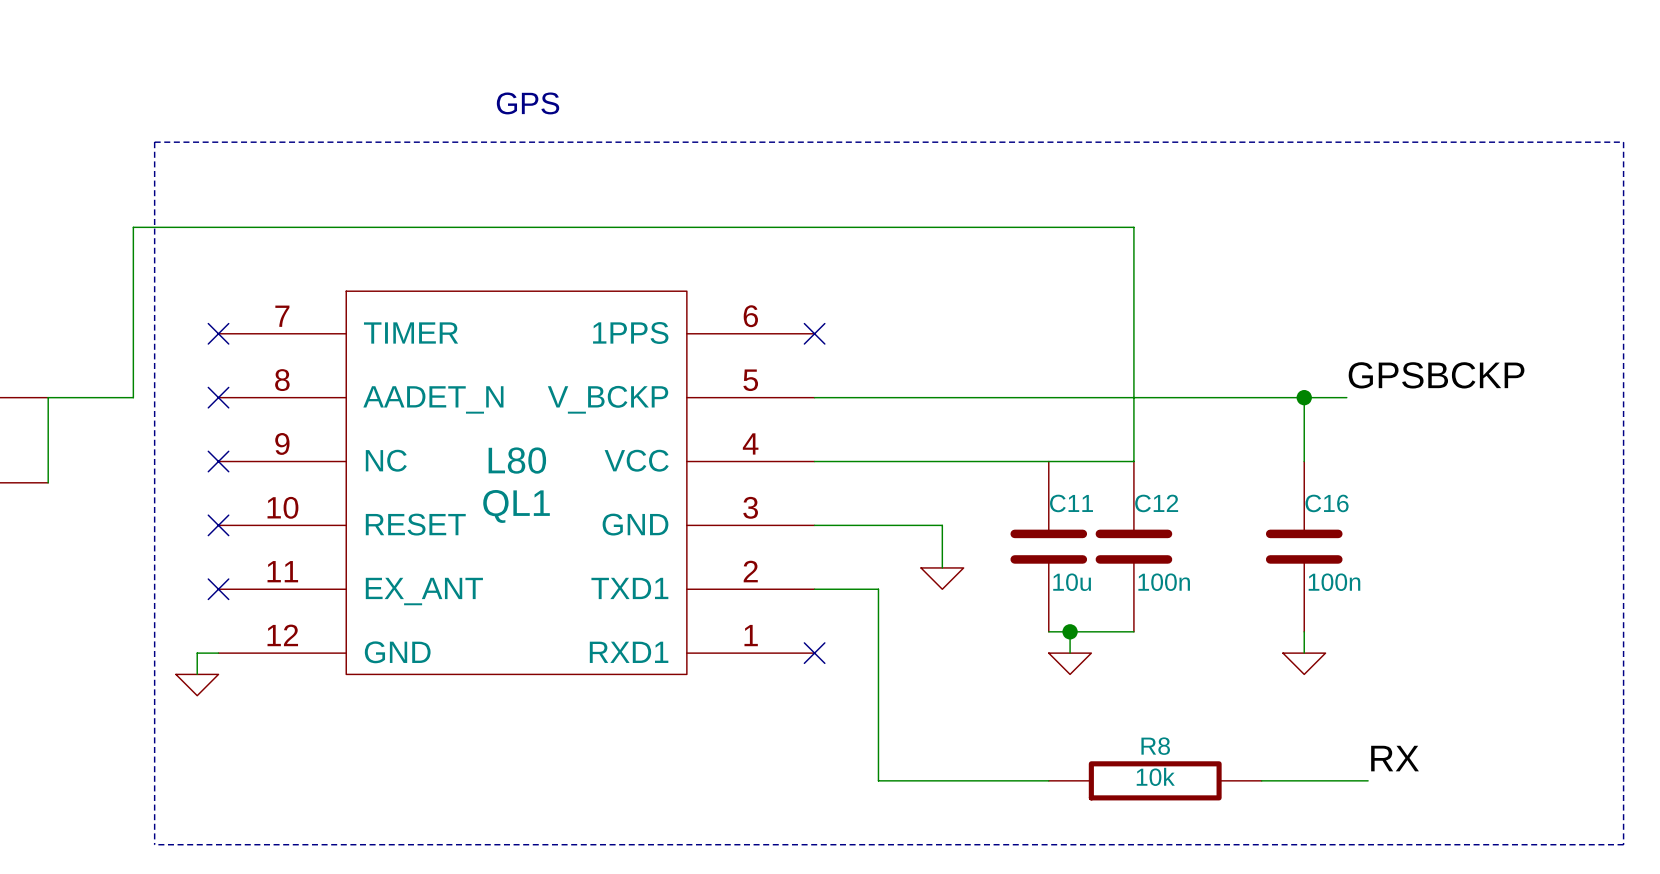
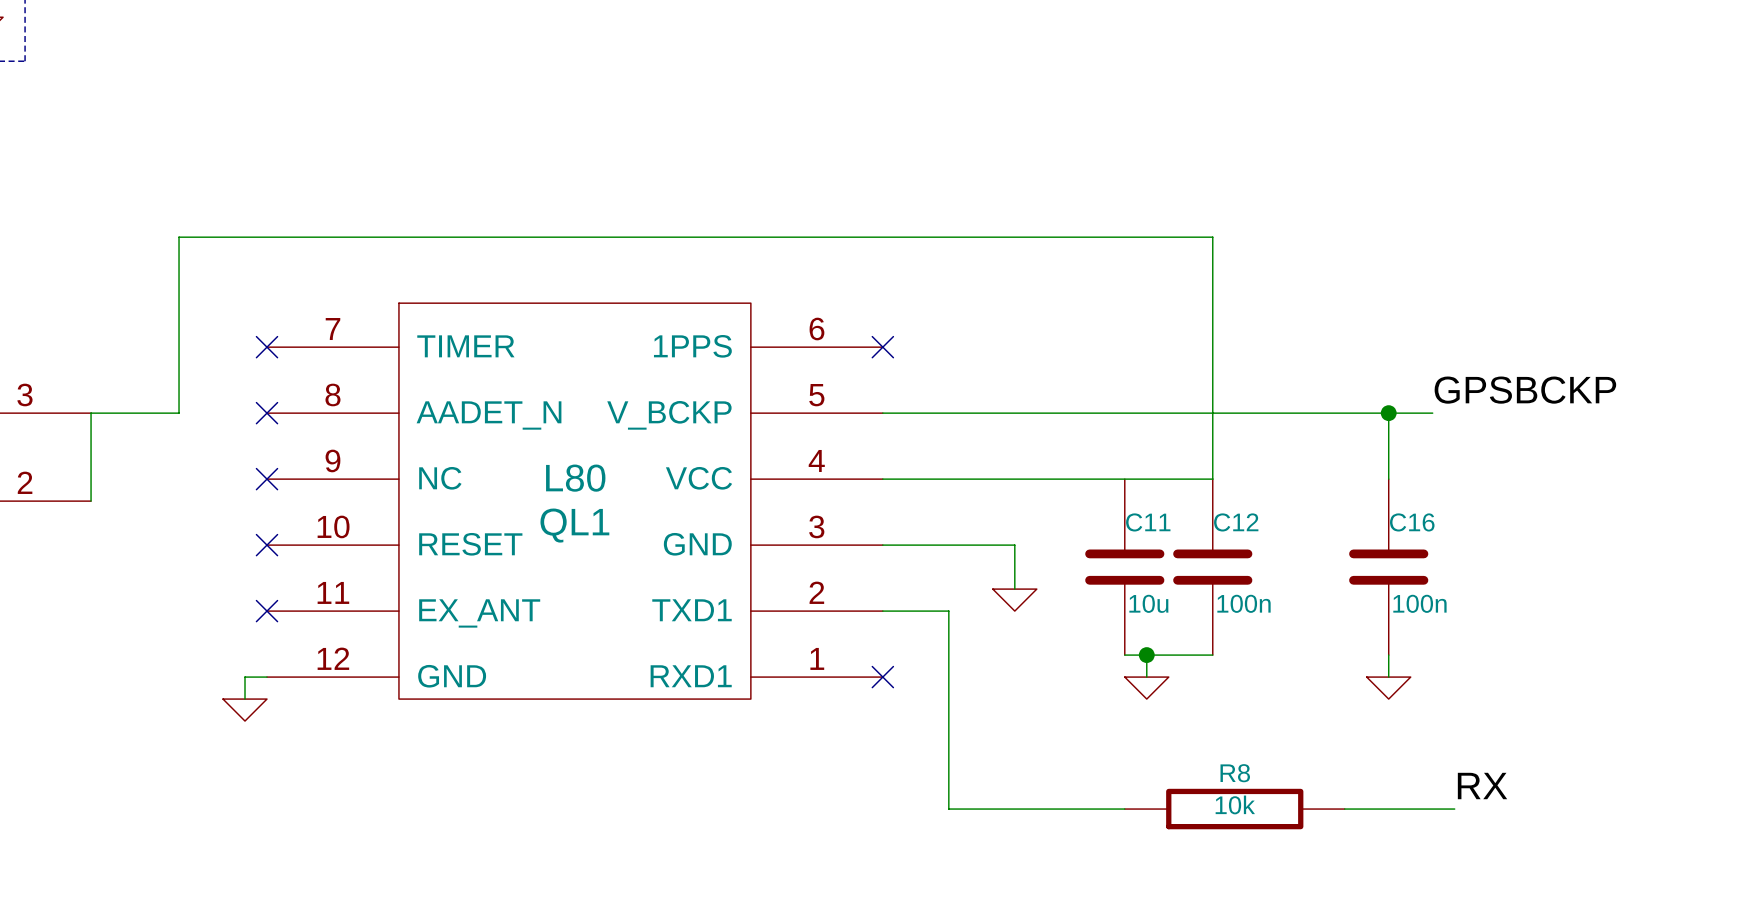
text: GPS (528, 103) -> none
line: (154, 142) (1623, 142) (1623, 844) (154, 844) (154, 142) -> none

